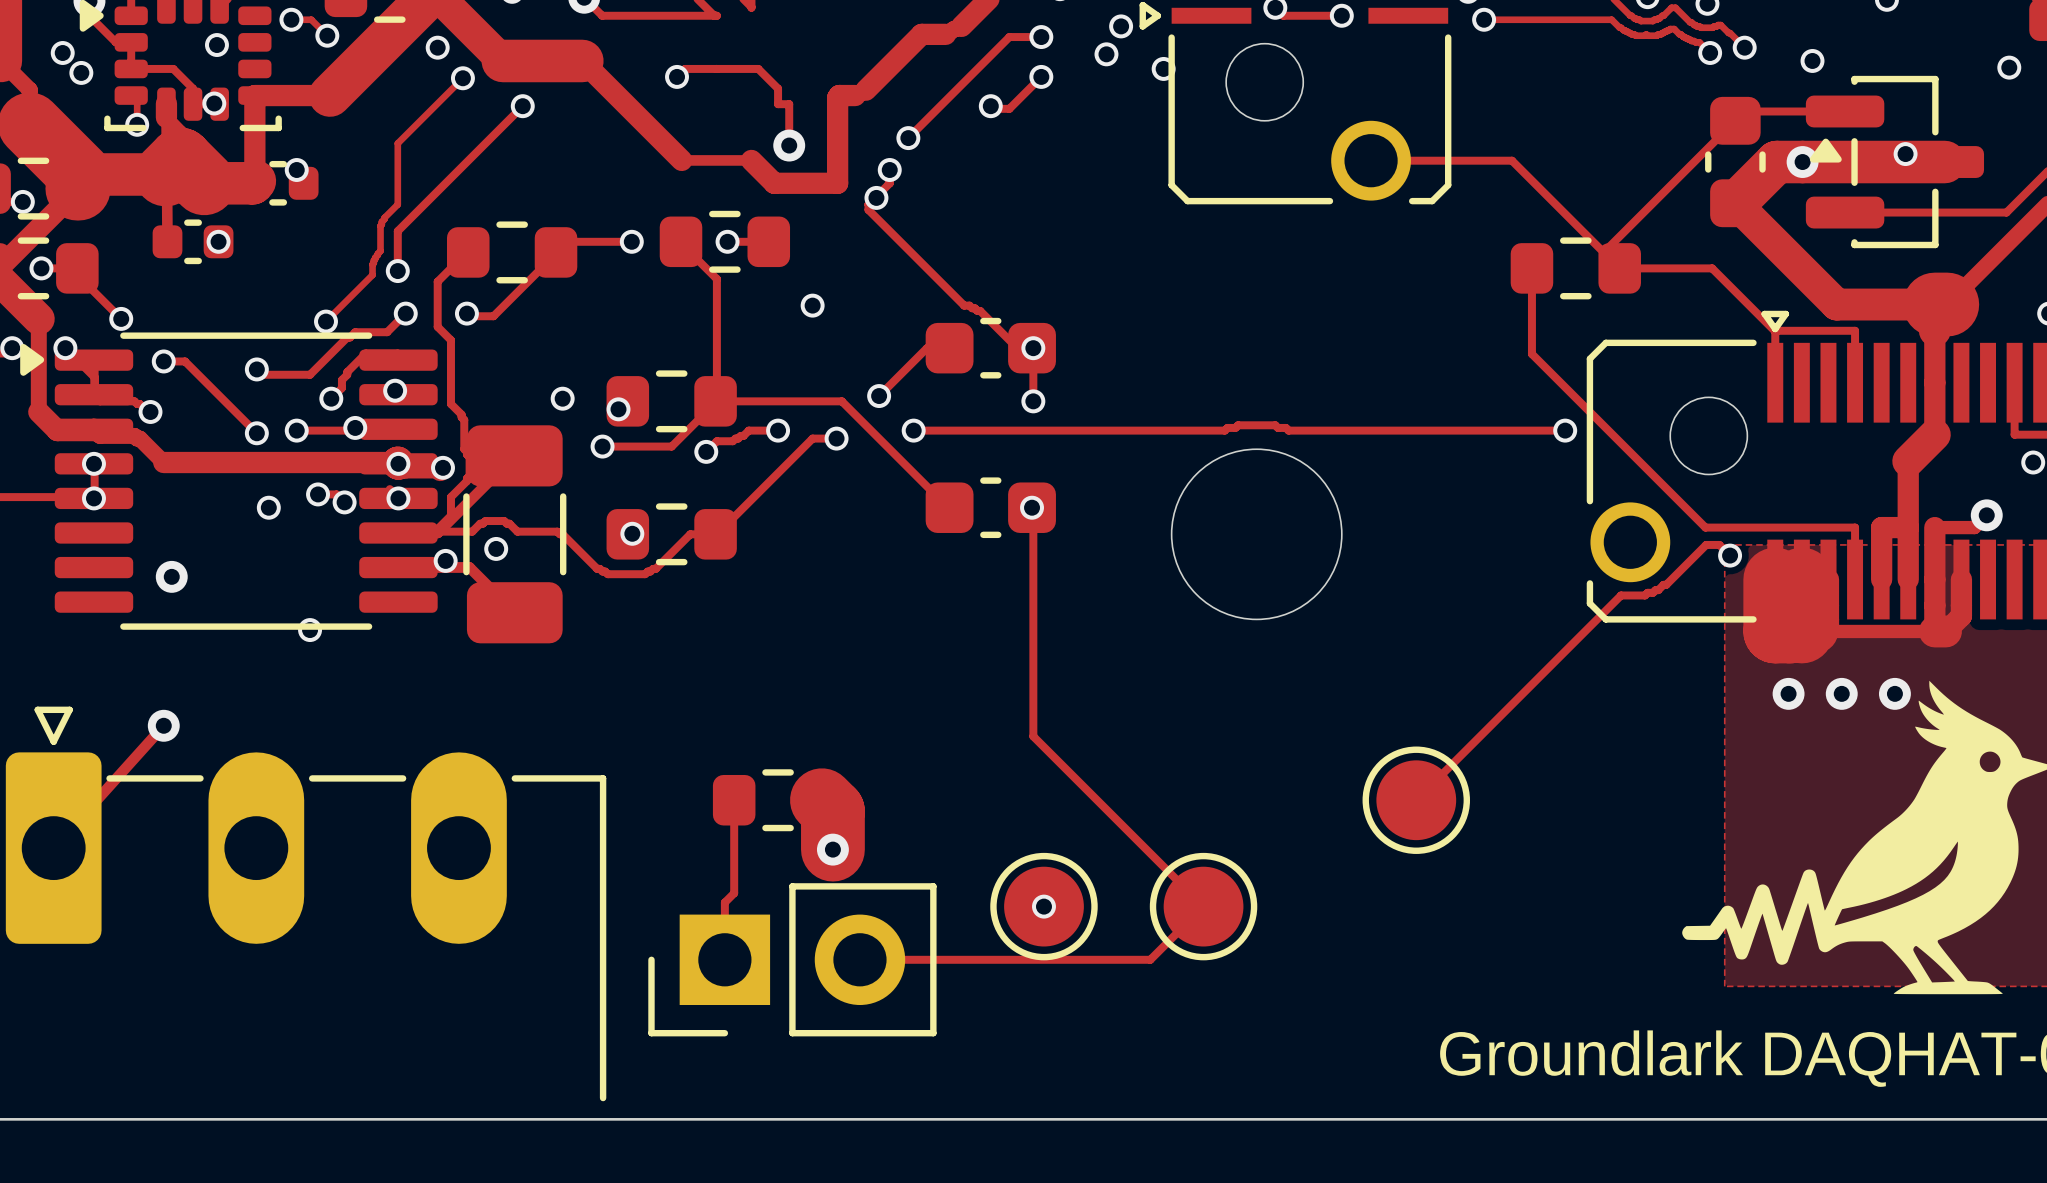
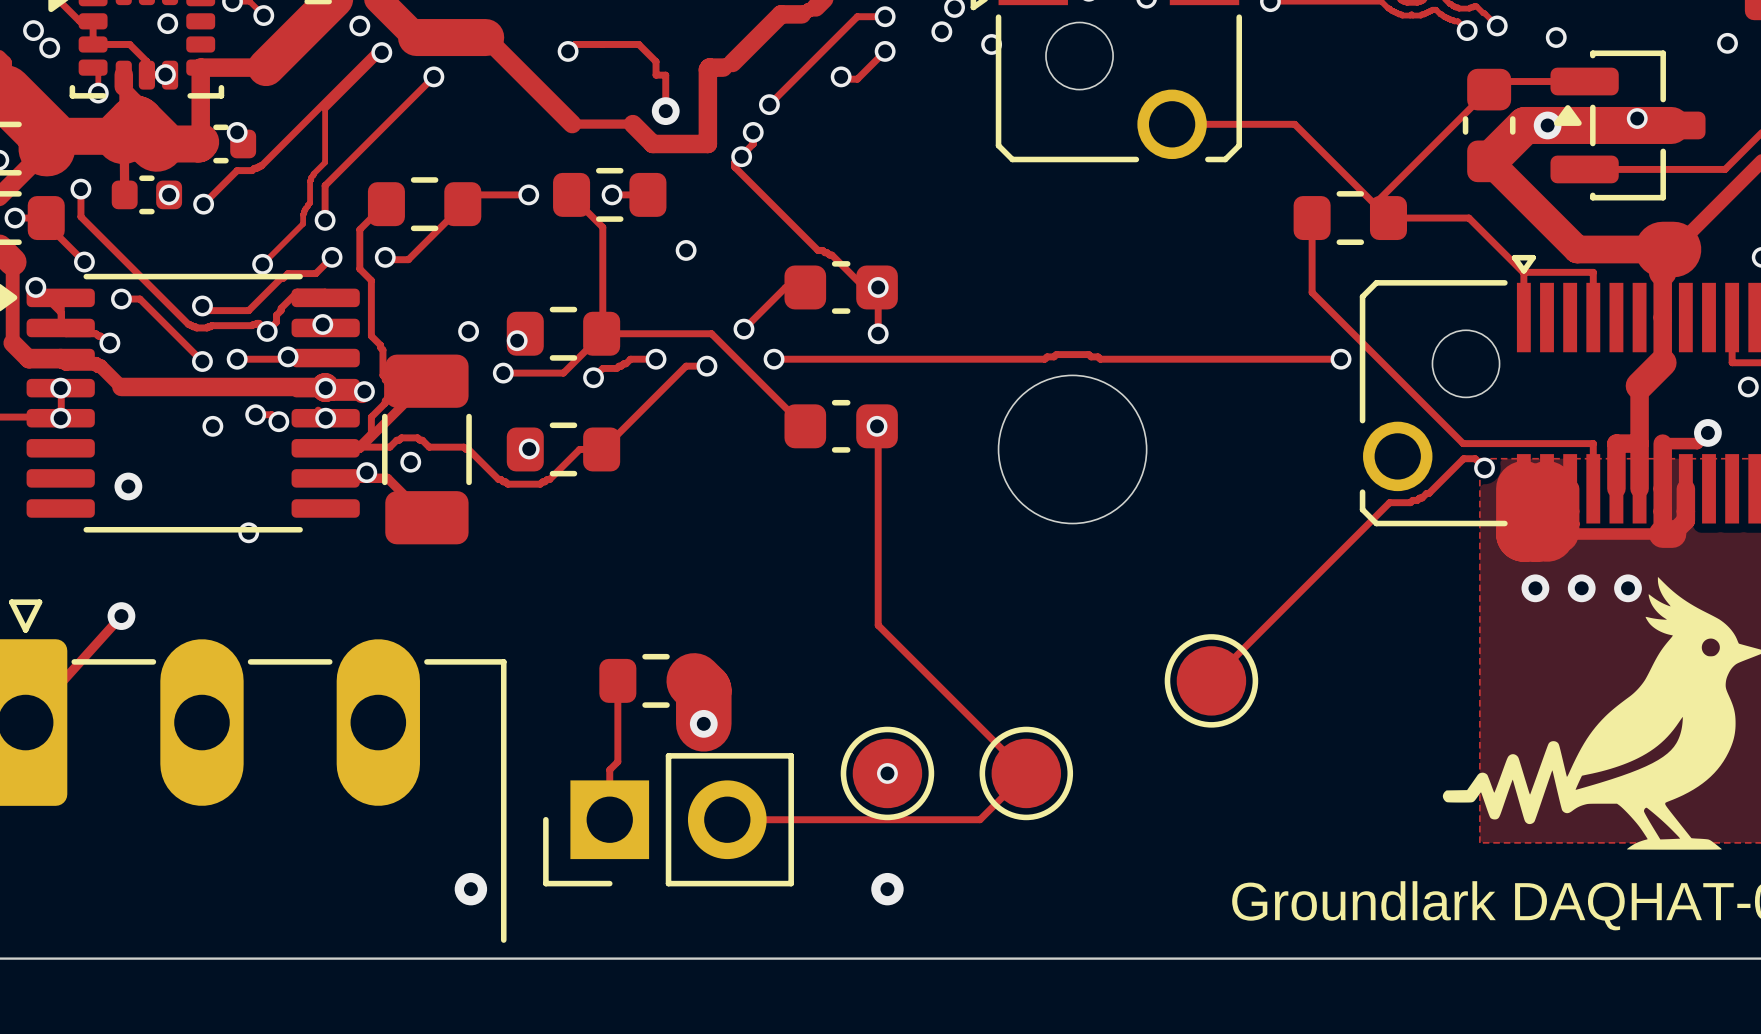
track: none -> (381, 52) (374, 52) (261, 165) (252, 170) (237, 170) (203, 204)
track: none -> (80, 189) (80, 216) (188, 324) (196, 327) (207, 327) (211, 325) (252, 325) (259, 323) (267, 331)
via: none -> (80, 189)
via: none -> (203, 204)
via: none -> (470, 889)
via: none -> (887, 889)

